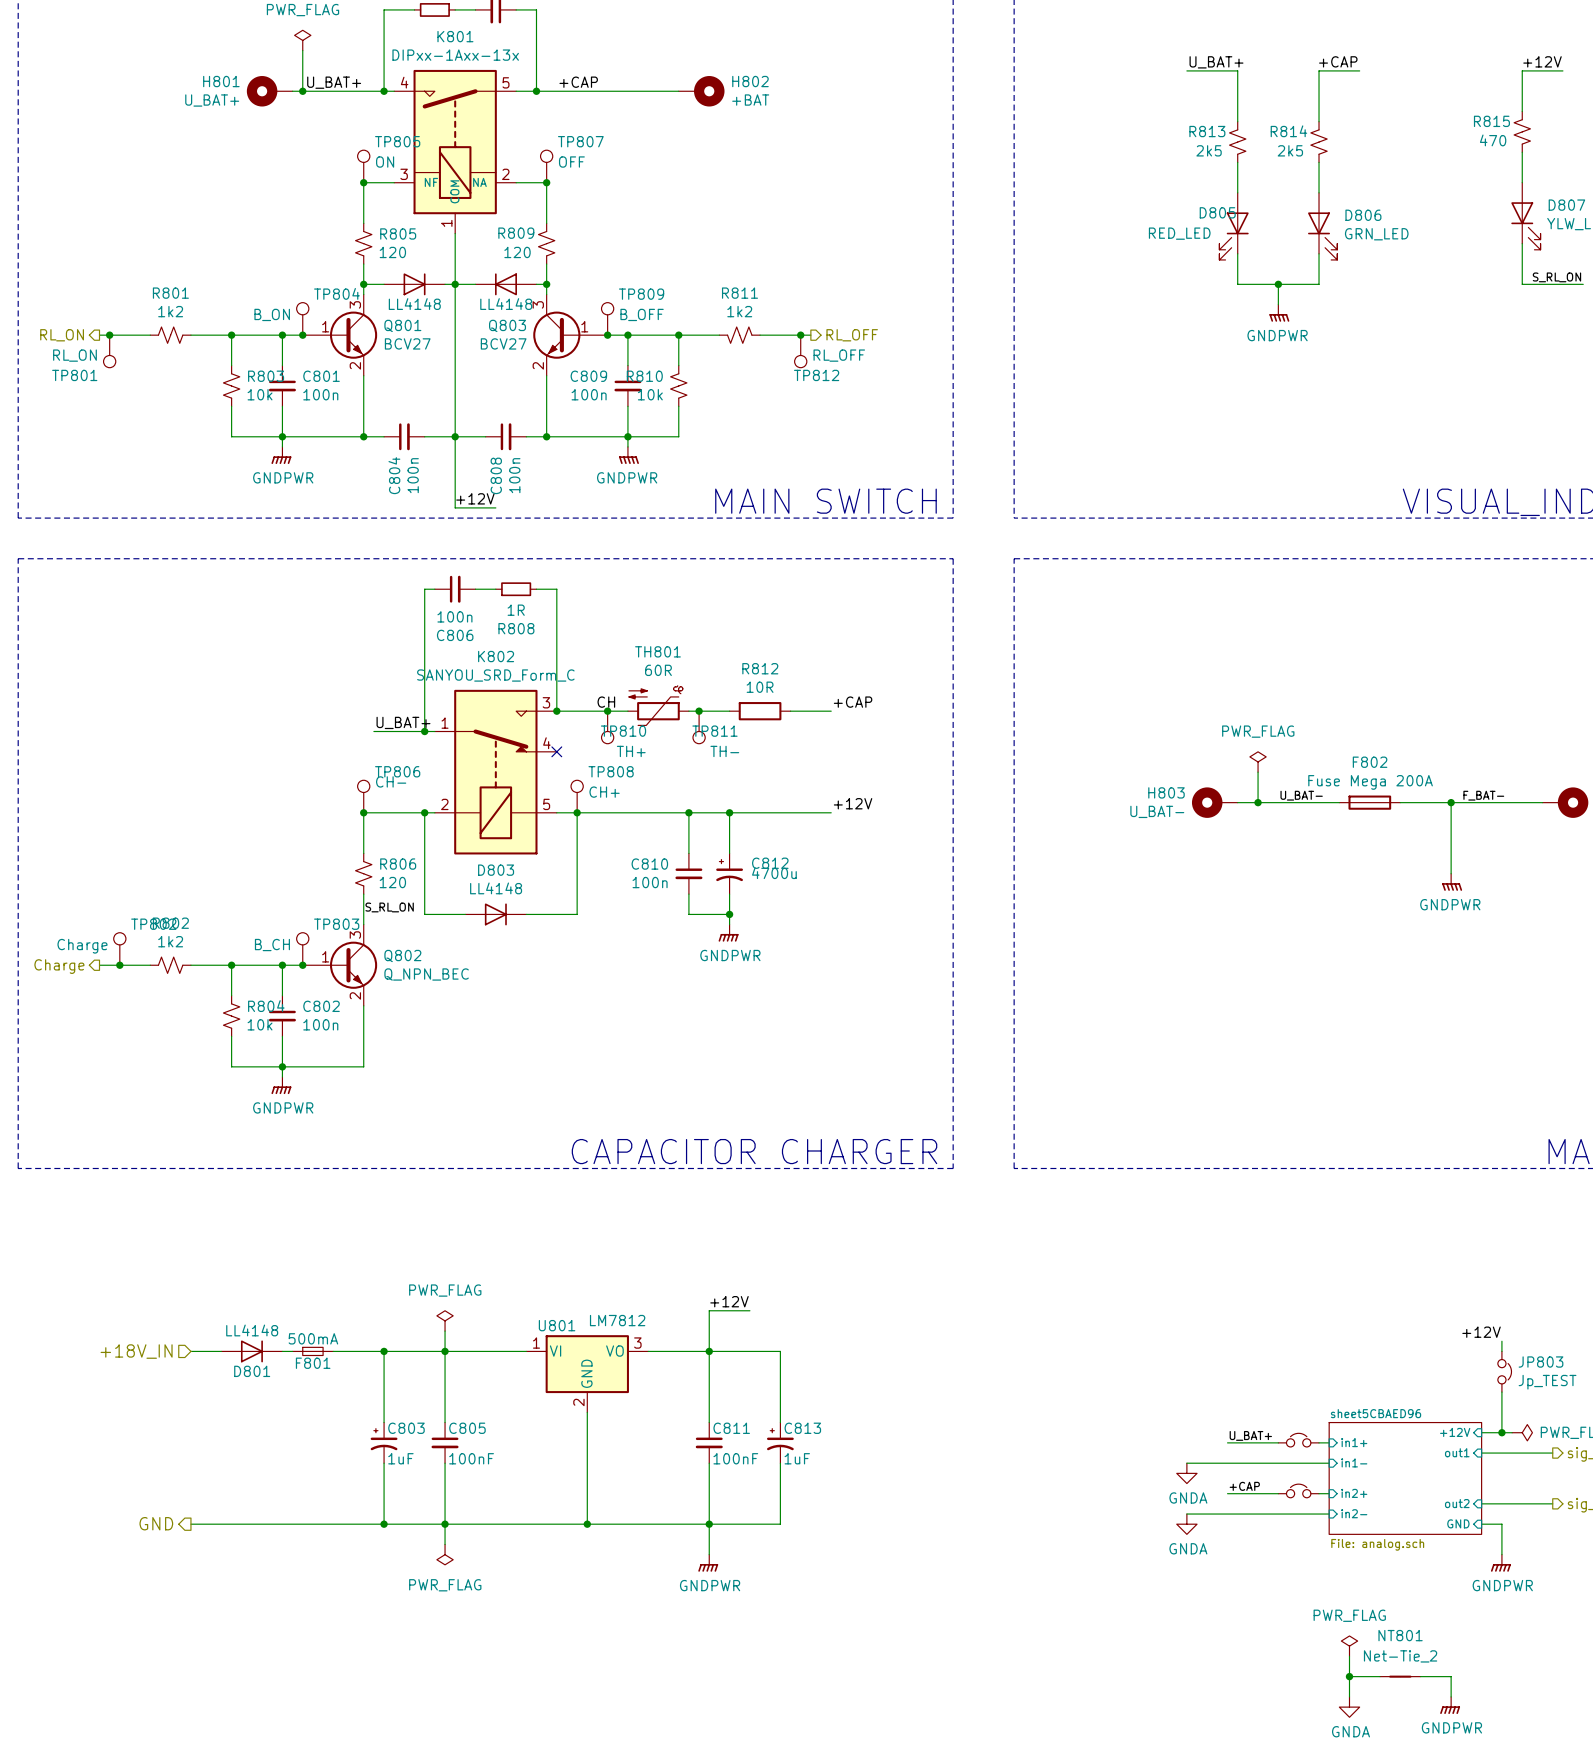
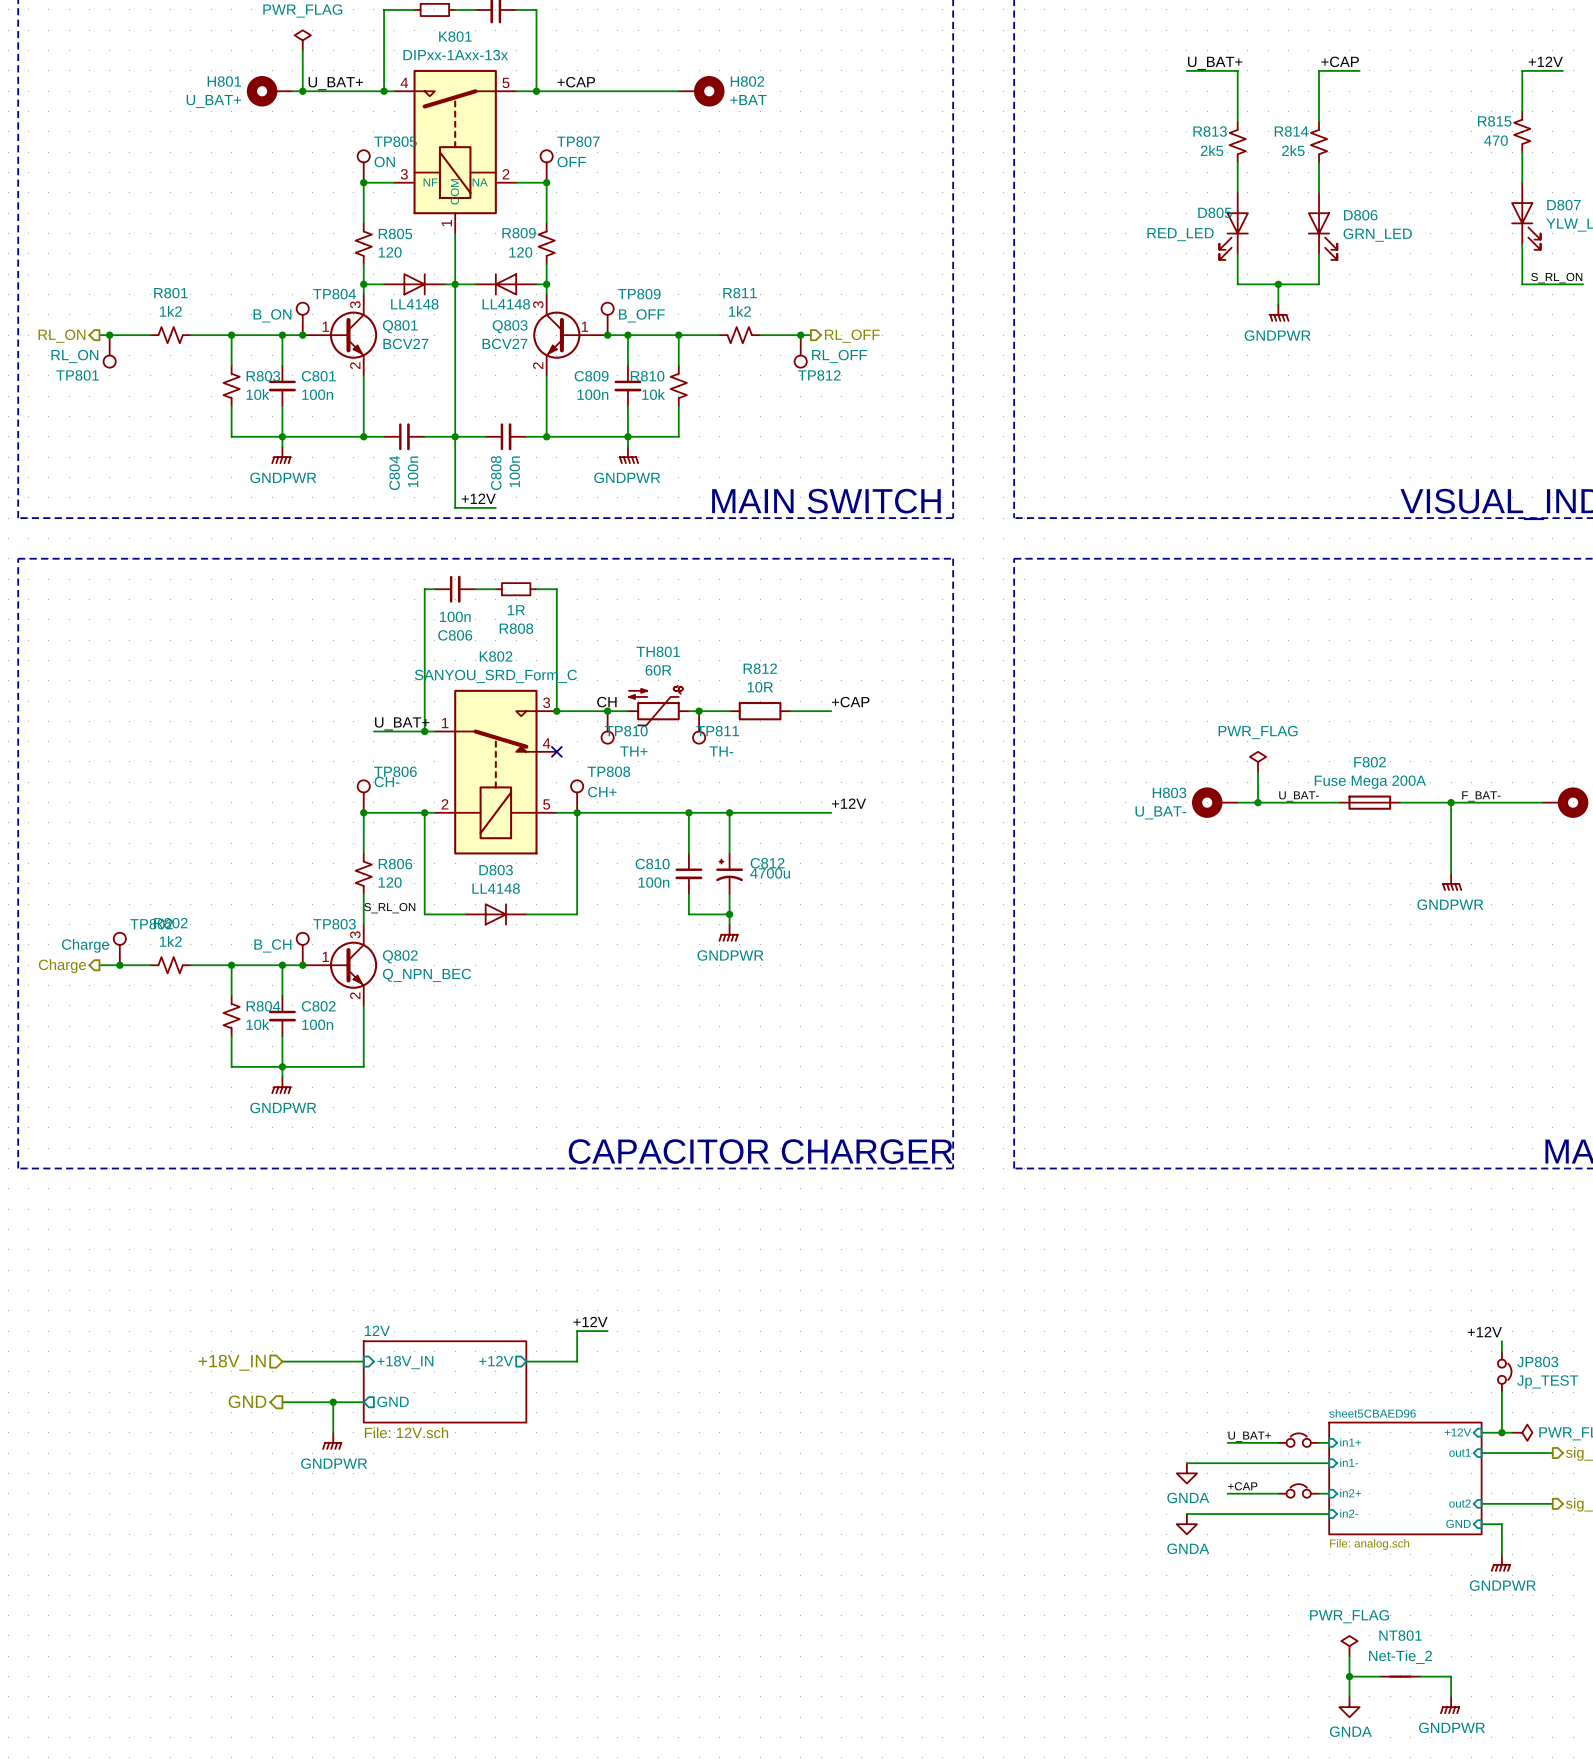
label position: +12V (729, 1301) -> +12V (590, 1321)
wire: (749, 1310) (709, 1310) (709, 1422) -> none
power symbol: PWR_FLAG (445, 1320) -> none
wire: (445, 1331) (445, 1422) -> none
wire: none -> (607, 1331) (577, 1331) (577, 1361) (526, 1361)
hierarchical label position: +18V_IN (136, 1351) -> +18V_IN (232, 1362)
wire: (190, 1351) (221, 1351) -> none
D801: LL4148 (251, 1351) -> none
wire: (282, 1351) (292, 1351) -> none
F801: 500mA (312, 1351) -> none
wire: (333, 1351) (526, 1351) -> none
wire: (384, 1351) (384, 1422) -> none
junction: (384, 1351) -> none
junction: (445, 1351) -> none
wire: (648, 1351) (780, 1351) (780, 1422) -> none
junction: (709, 1351) -> none
wire: none -> (282, 1361) (363, 1361)
sheet pin: none -> +18V_IN (405, 1362)
sheet pin: none -> +12V (496, 1361)
U801: LM7812 (587, 1373) -> none
sheet 12V: none -> File: 12V.sch (445, 1381)
sheet pin: none -> GND (393, 1401)
wire: none -> (282, 1402) (363, 1402)
wire: none -> (333, 1402) (333, 1432)
junction: none -> (333, 1402)
wire: (587, 1412) (587, 1524) -> none
power symbol: none -> GNDPWR (332, 1441)
C803: 1uF (384, 1442) -> none
C805: 100nF (445, 1442) -> none
C811: 100nF (709, 1442) -> none
C813: 1uF (780, 1442) -> none
wire: (384, 1463) (384, 1524) -> none
wire: (445, 1463) (445, 1544) -> none
wire: (709, 1463) (709, 1554) -> none
wire: (780, 1463) (780, 1524) (190, 1524) -> none
hierarchical label position: GND (156, 1523) -> GND (247, 1401)
junction: (384, 1524) -> none
junction: (445, 1524) -> none
junction: (587, 1524) -> none
junction: (709, 1524) -> none
power symbol: PWR_FLAG (445, 1554) -> none
power symbol: GNDPWR (708, 1563) -> none

